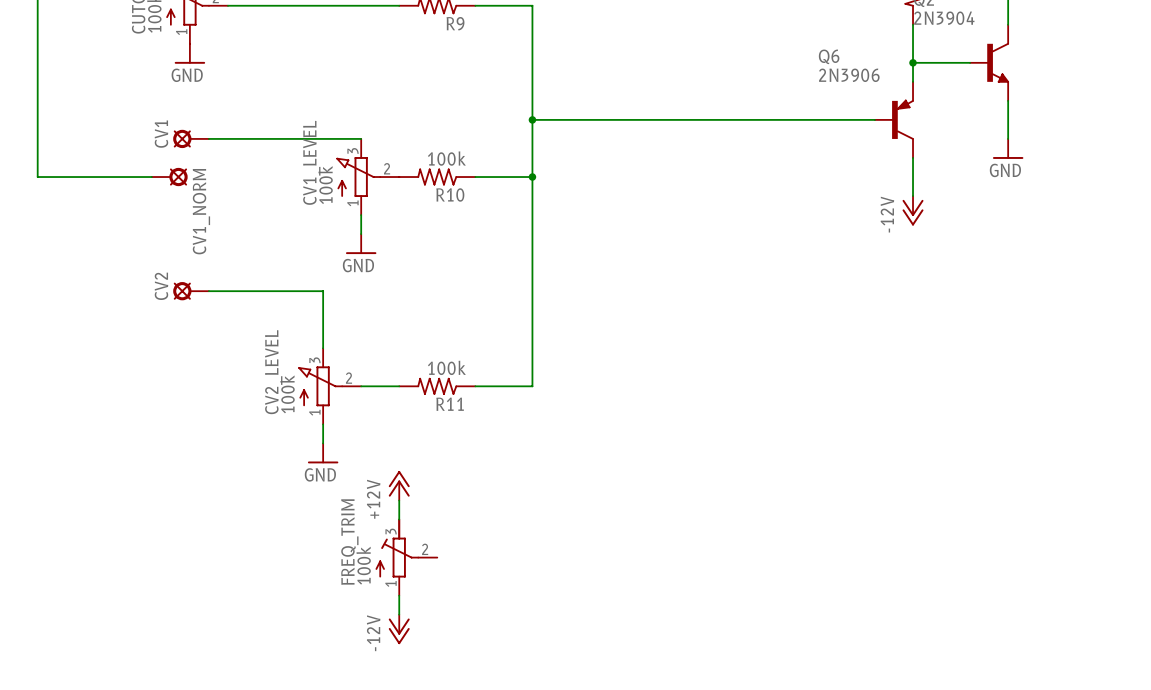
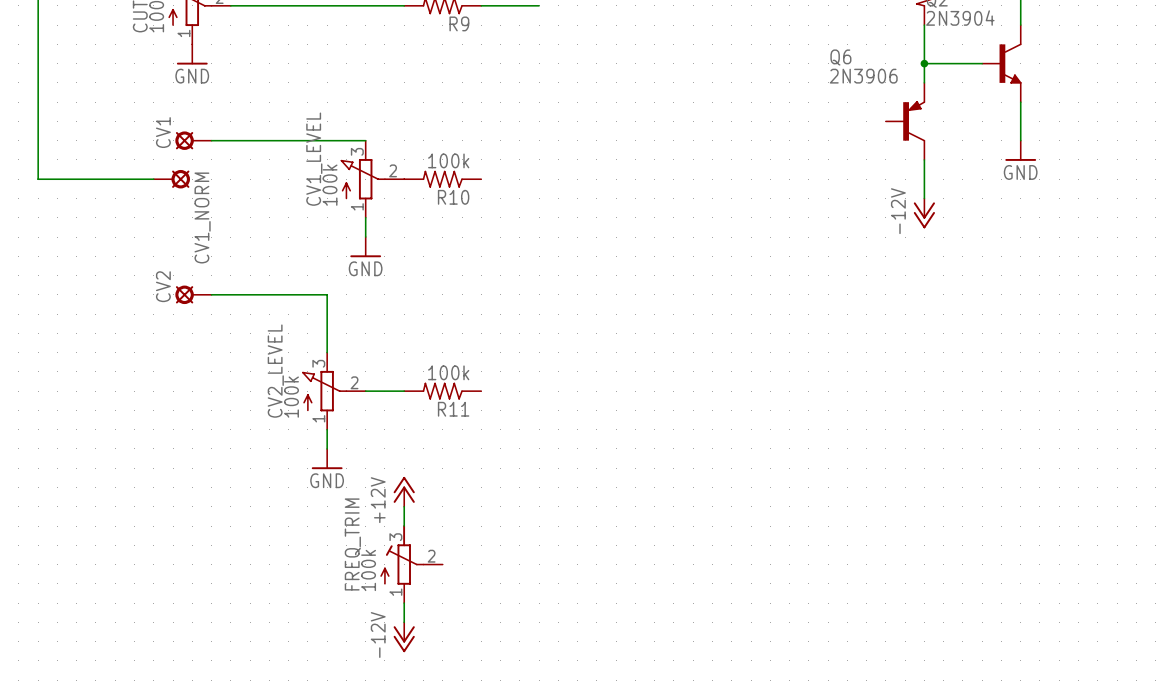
wire: (532, 5) (532, 386) (475, 386) -> none
wire: (532, 119) (874, 119) -> none
junction: (532, 119) -> none
wire: (475, 177) (532, 177) -> none
junction: (532, 177) -> none

